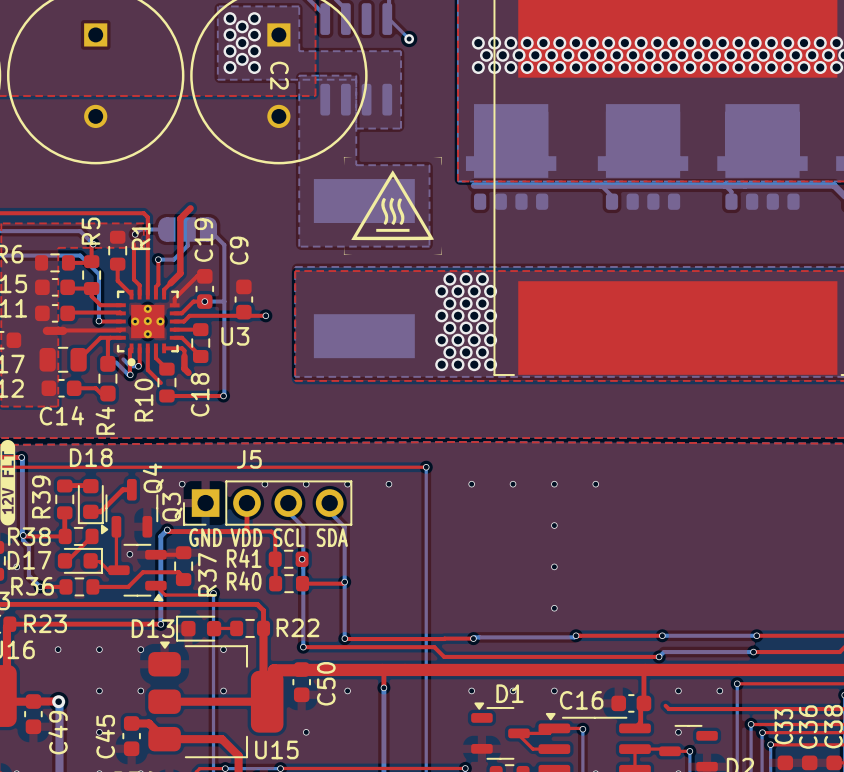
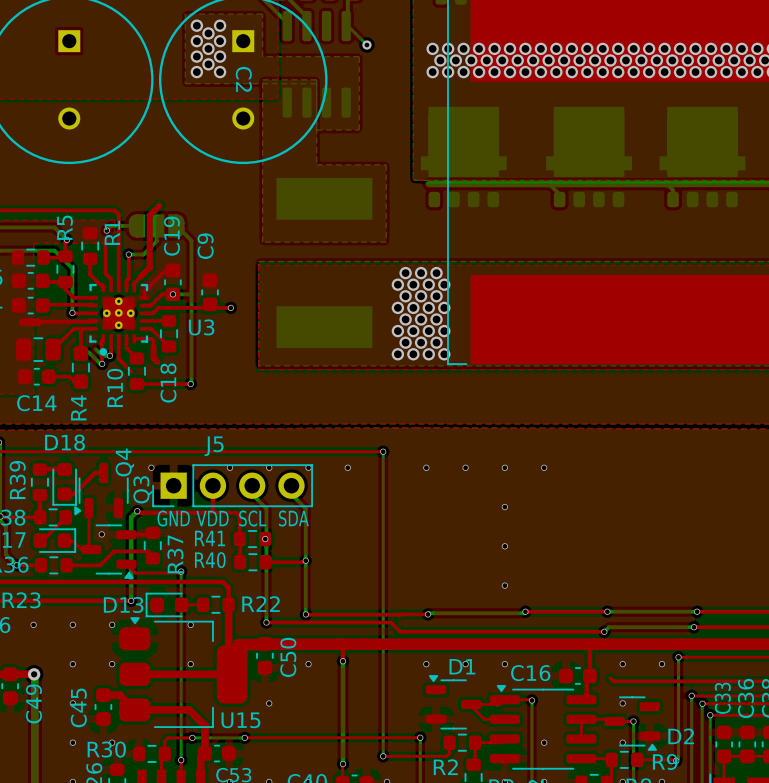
drawing: [343, 156, 442, 255] -> none

